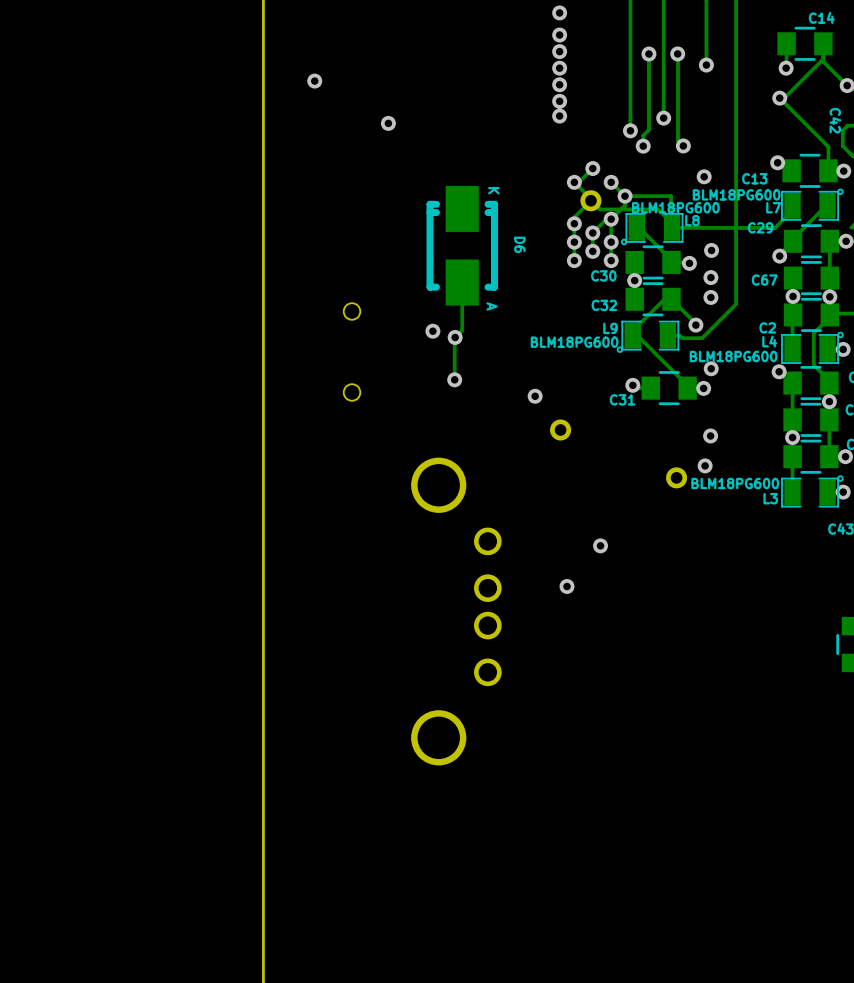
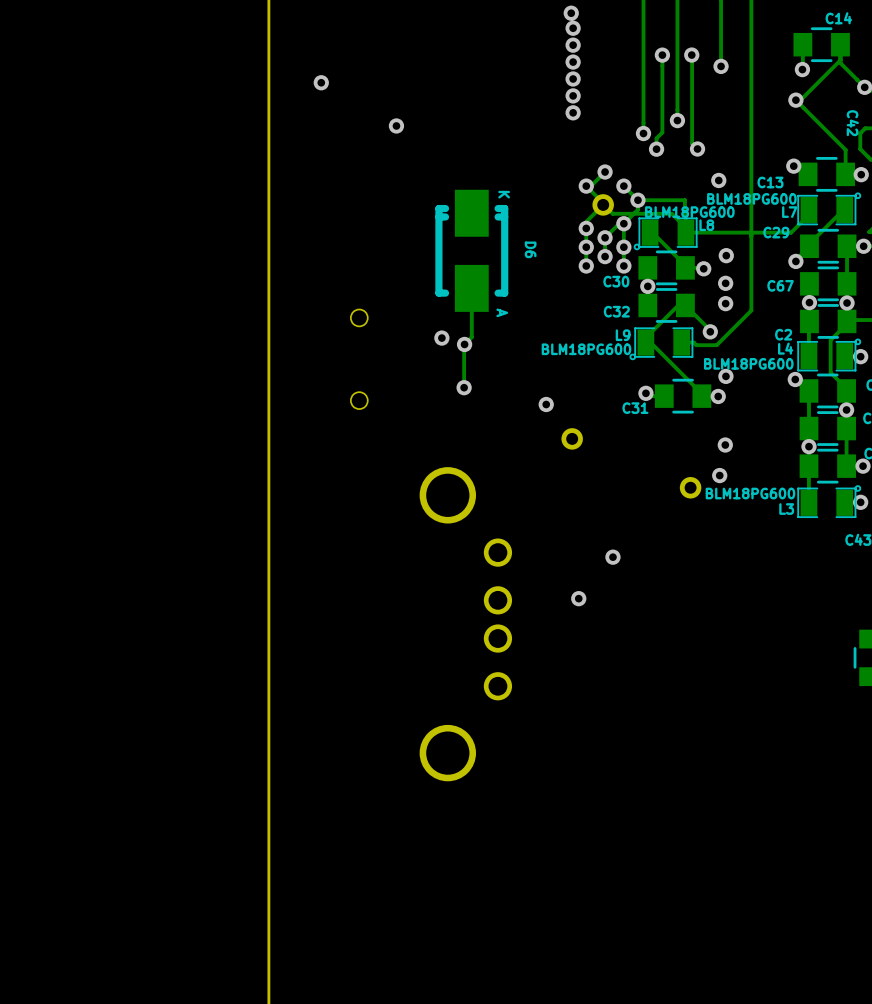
via: none -> (573, 28)
via: (559, 35) -> none
via: none -> (573, 45)
via: (559, 51) -> none
via: none -> (573, 62)
via: (559, 68) -> none
via: none -> (573, 78)
via: (559, 84) -> none
via: none -> (573, 95)
via: (559, 101) -> none
via: none -> (573, 112)
via: (559, 116) -> none

